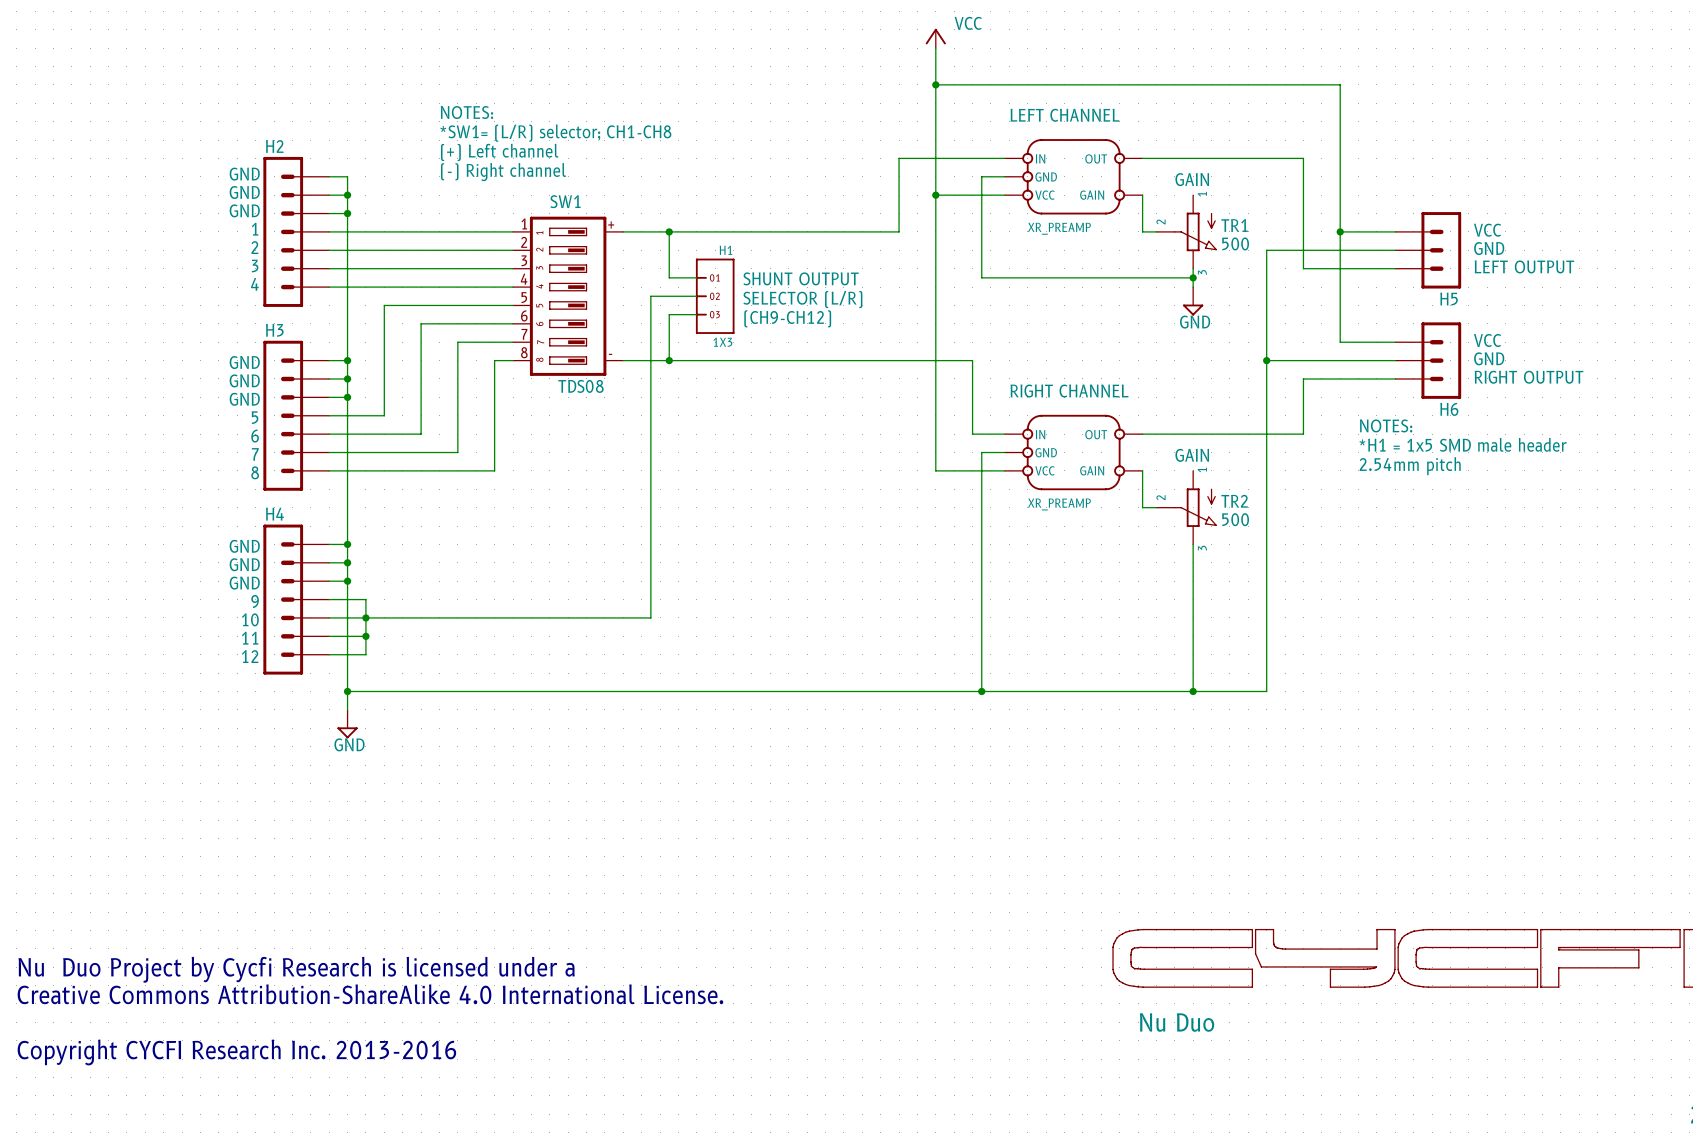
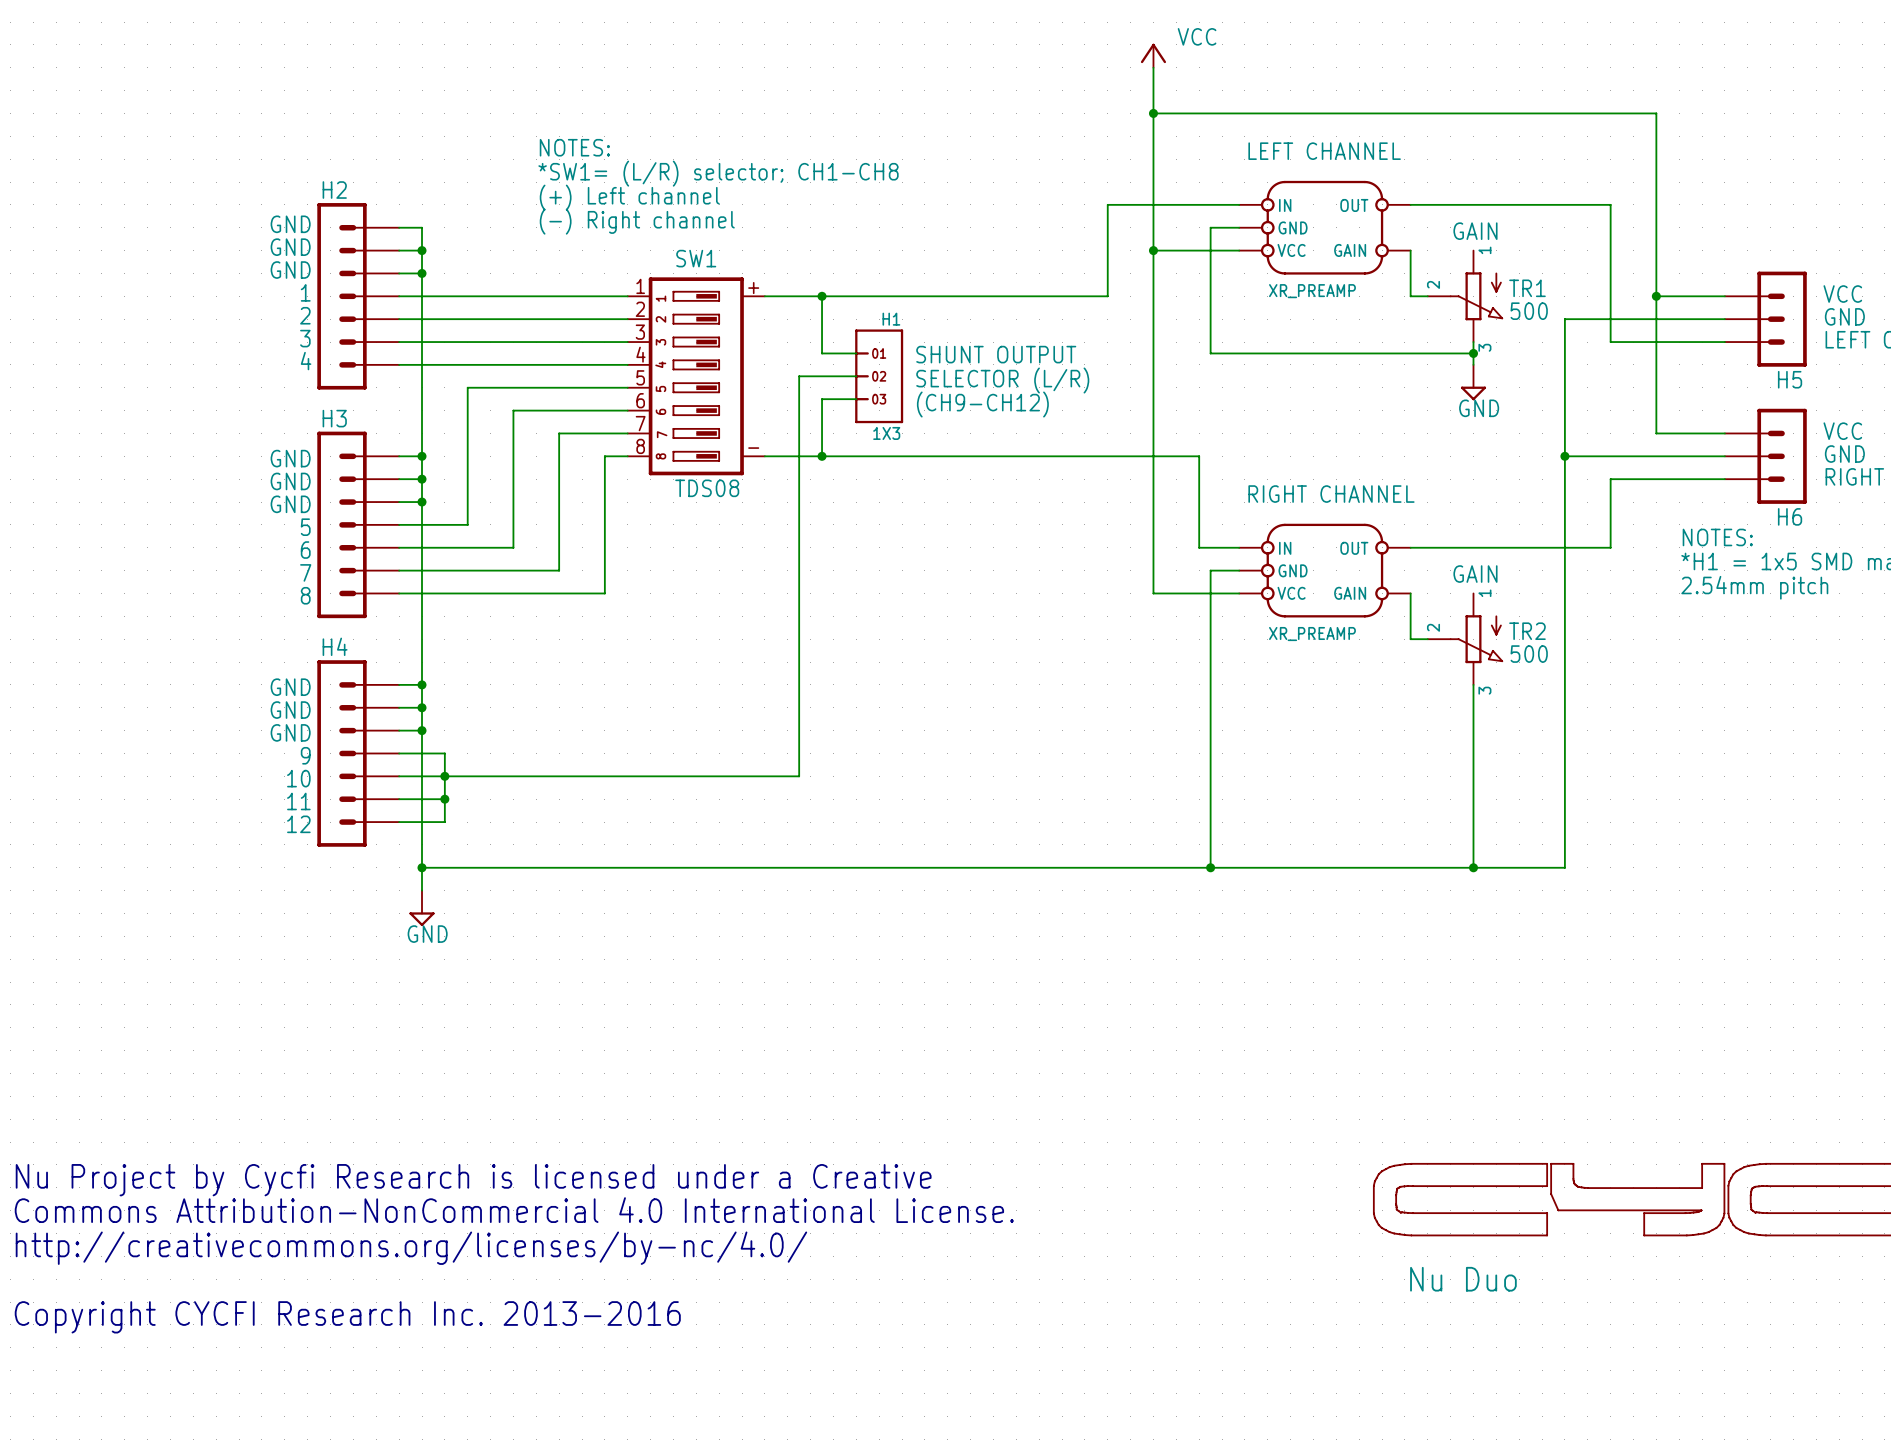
text: none -> Nu Project by Cycfi Research is licensed under a Creative (473, 1180)
text: Nu Duo Project by Cycfi Research is licensed under a (296, 969) -> Commons Attribution-NonCommercial 4.0 International License. (514, 1210)
text: Creative Commons Attribution-ShareAlike 4.0 International License. (370, 994) -> http://creativecommons.org/licenses/by-nc/4.0/ (411, 1248)

